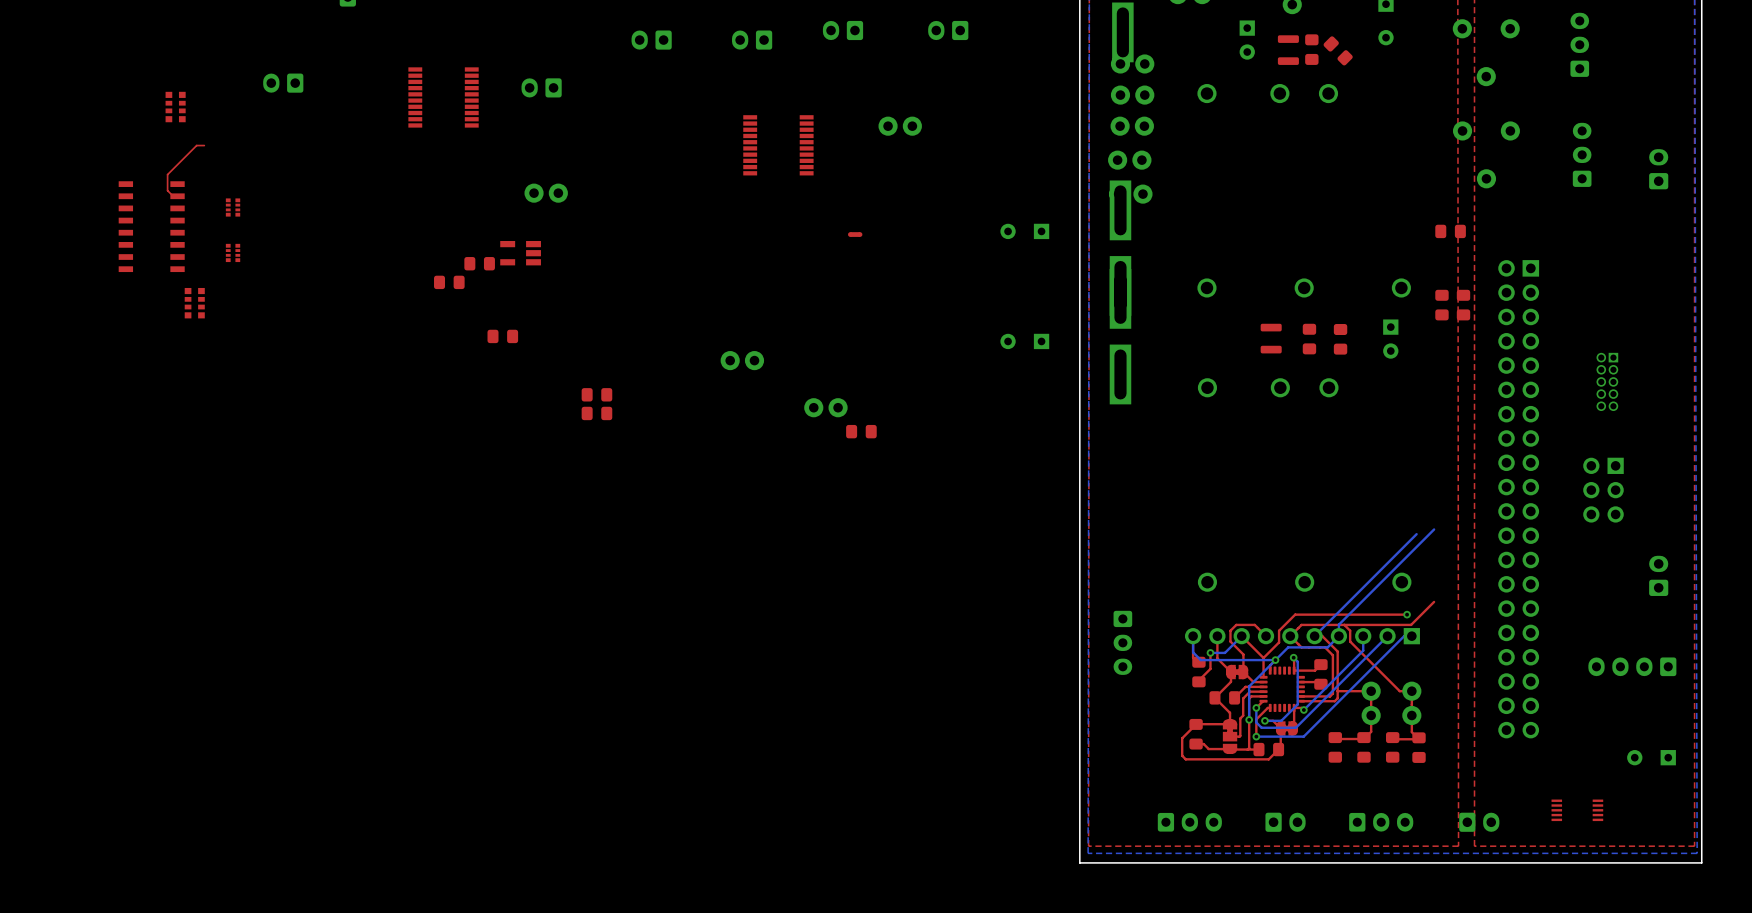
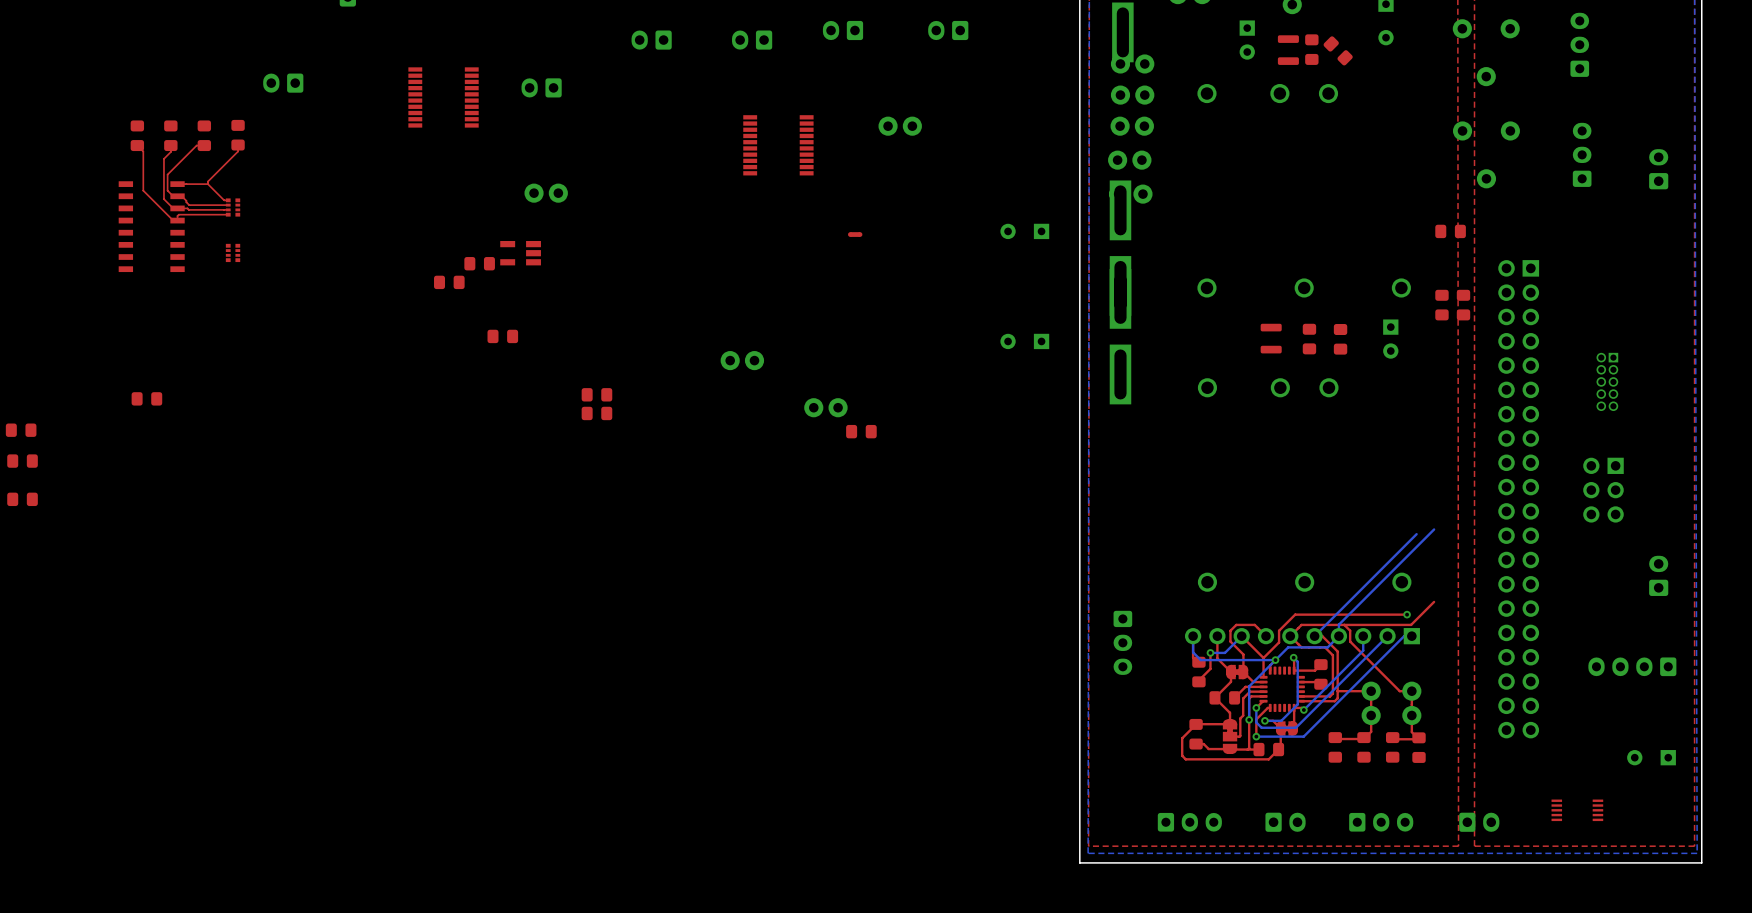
part: (175, 107) -> none
part: none -> (137, 135)
part: none -> (170, 135)
part: none -> (204, 135)
part: none -> (238, 135)
top track: none -> (137, 145) (143, 151) (143, 190) (173, 220) (177, 220) (178, 214) (228, 214)
top track: none -> (170, 145) (170, 152) (163, 158) (163, 199) (173, 208) (228, 209)
top track: none -> (238, 145) (238, 151) (207, 181) (207, 184)
top track: none -> (207, 184) (177, 184)
top track: none -> (207, 184) (224, 200) (228, 200)
top track: none -> (177, 196) (181, 196) (189, 205) (228, 205)
part: (194, 303) -> none
part: none -> (146, 398)
part: none -> (21, 430)
part: none -> (22, 461)
part: none -> (22, 499)

